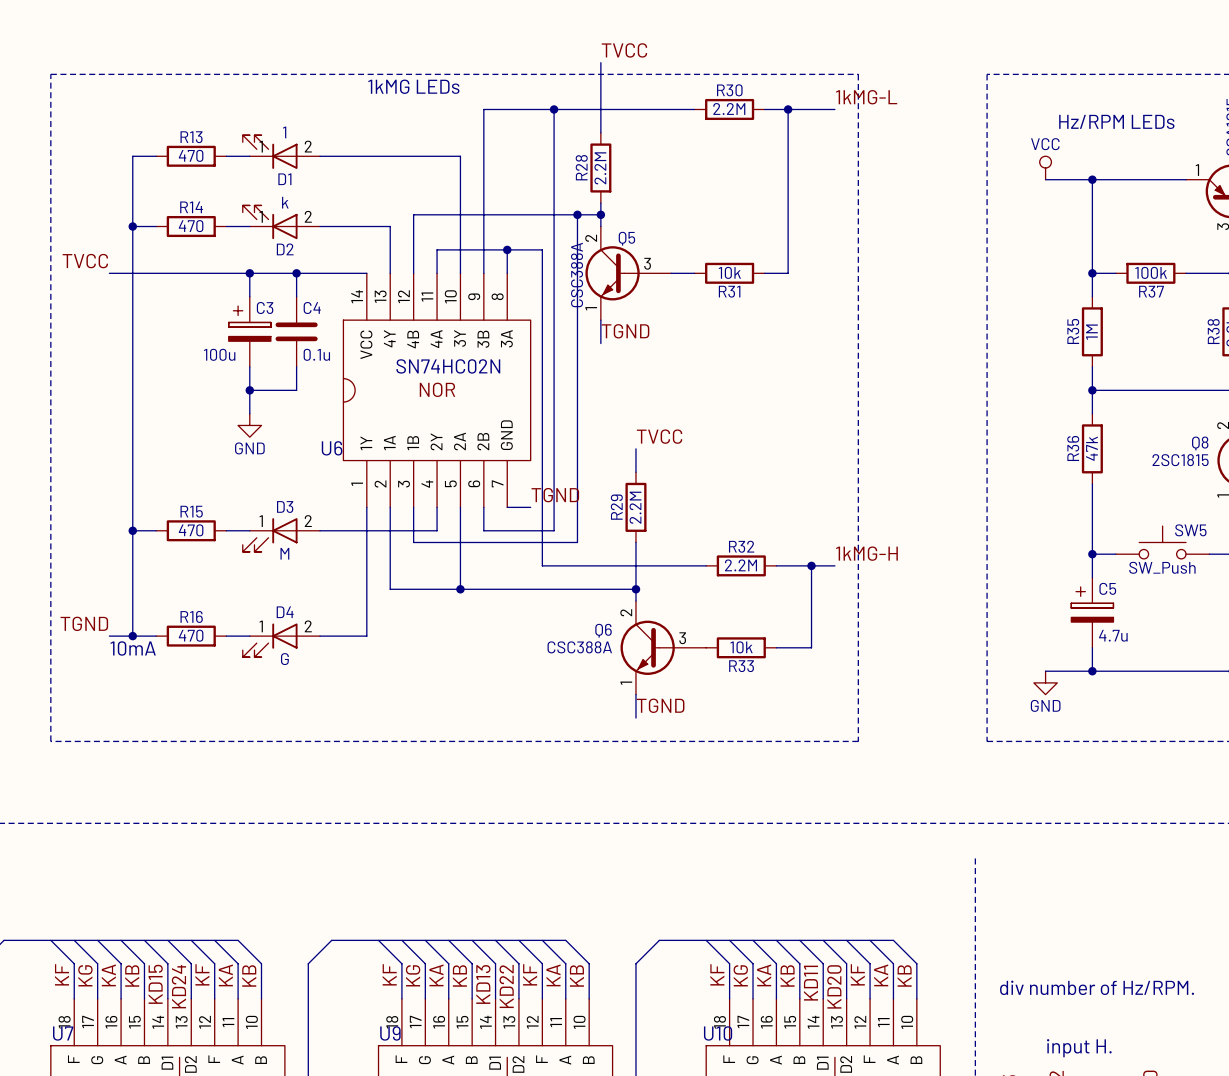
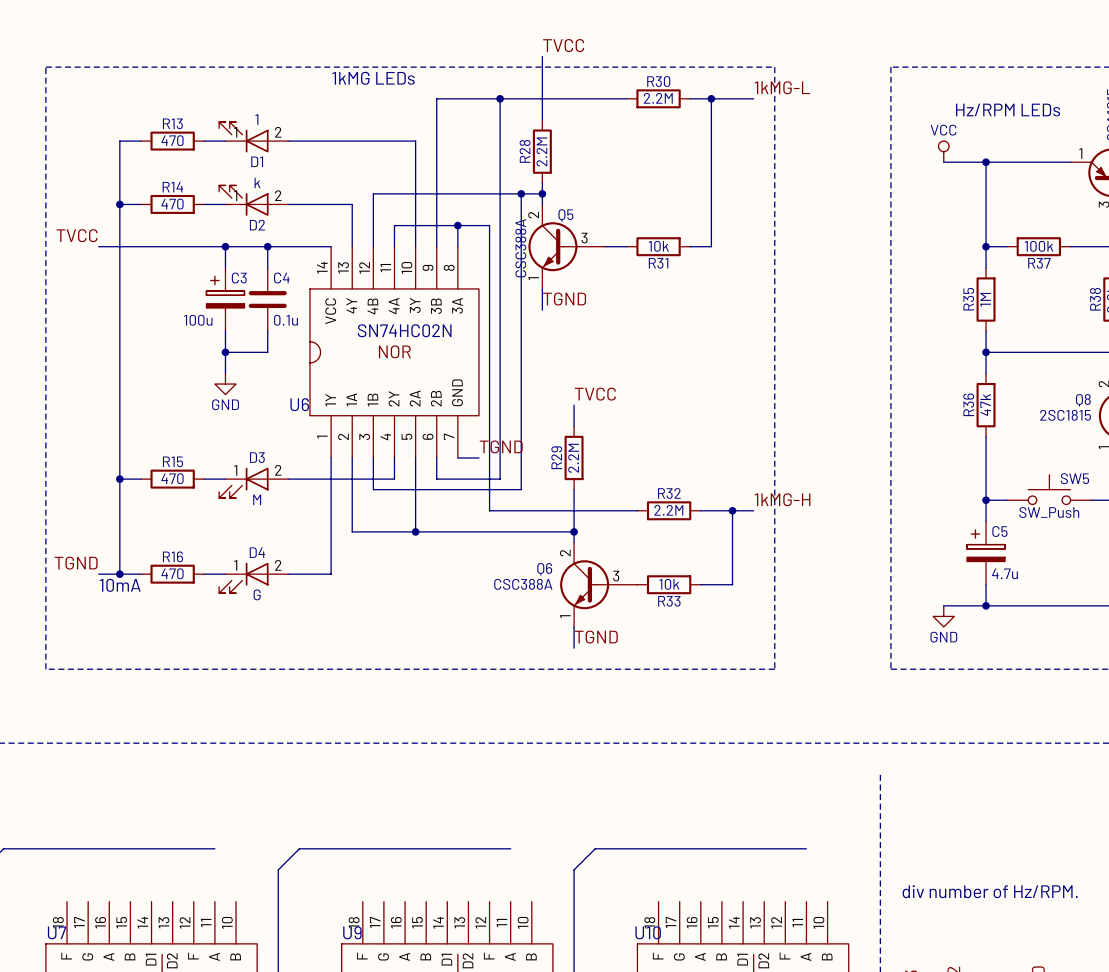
wire: (50, 940) (74, 963) (74, 998) -> none
wire: (74, 940) (97, 963) (97, 998) -> none
wire: (97, 940) (121, 963) (121, 998) -> none
wire: (121, 940) (144, 963) (144, 998) -> none
wire: (144, 940) (167, 963) (167, 998) -> none
wire: (167, 940) (191, 963) (191, 998) -> none
wire: (191, 940) (214, 963) (214, 998) -> none
wire: (214, 940) (238, 963) (238, 998) -> none
wire: (238, 940) (261, 963) (261, 998) -> none
wire: (378, 940) (401, 963) (401, 998) -> none
wire: (401, 940) (425, 963) (425, 998) -> none
wire: (425, 940) (448, 963) (448, 998) -> none
wire: (448, 940) (472, 963) (472, 998) -> none
wire: (472, 940) (495, 963) (495, 998) -> none
wire: (495, 940) (518, 963) (518, 998) -> none
wire: (518, 940) (542, 963) (542, 998) -> none
wire: (542, 940) (565, 963) (565, 998) -> none
wire: (565, 940) (589, 963) (589, 998) -> none
wire: (706, 940) (729, 963) (729, 998) -> none
wire: (729, 940) (753, 963) (753, 998) -> none
wire: (753, 940) (776, 963) (776, 998) -> none
wire: (776, 940) (799, 963) (799, 998) -> none
wire: (799, 940) (823, 963) (823, 998) -> none
wire: (823, 940) (846, 963) (846, 998) -> none
wire: (846, 940) (870, 963) (870, 998) -> none
wire: (870, 940) (893, 963) (893, 998) -> none
wire: (893, 940) (916, 963) (916, 998) -> none
label: KF (62, 974) -> none
label: KF (202, 974) -> none
label: KF (389, 974) -> none
label: KF (530, 974) -> none
label: KF (717, 974) -> none
label: KF (857, 974) -> none
label: KG (85, 975) -> none
label: KA (108, 975) -> none
label: KB (132, 975) -> none
label: KA (225, 975) -> none
label: KB (249, 975) -> none
label: KG (413, 975) -> none
label: KA (436, 975) -> none
label: KB (459, 975) -> none
label: KA (553, 975) -> none
label: KB (576, 975) -> none
label: KG (740, 975) -> none
label: KA (764, 975) -> none
label: KB (787, 975) -> none
label: KA (881, 975) -> none
label: KB (904, 975) -> none
label: KD11 (810, 983) -> none
label: KD15 (155, 984) -> none
label: KD13 (483, 984) -> none
label: KD24 (178, 986) -> none
label: KD22 (506, 986) -> none
label: KD20 (834, 986) -> none
text: input H. (1079, 1048) -> none

